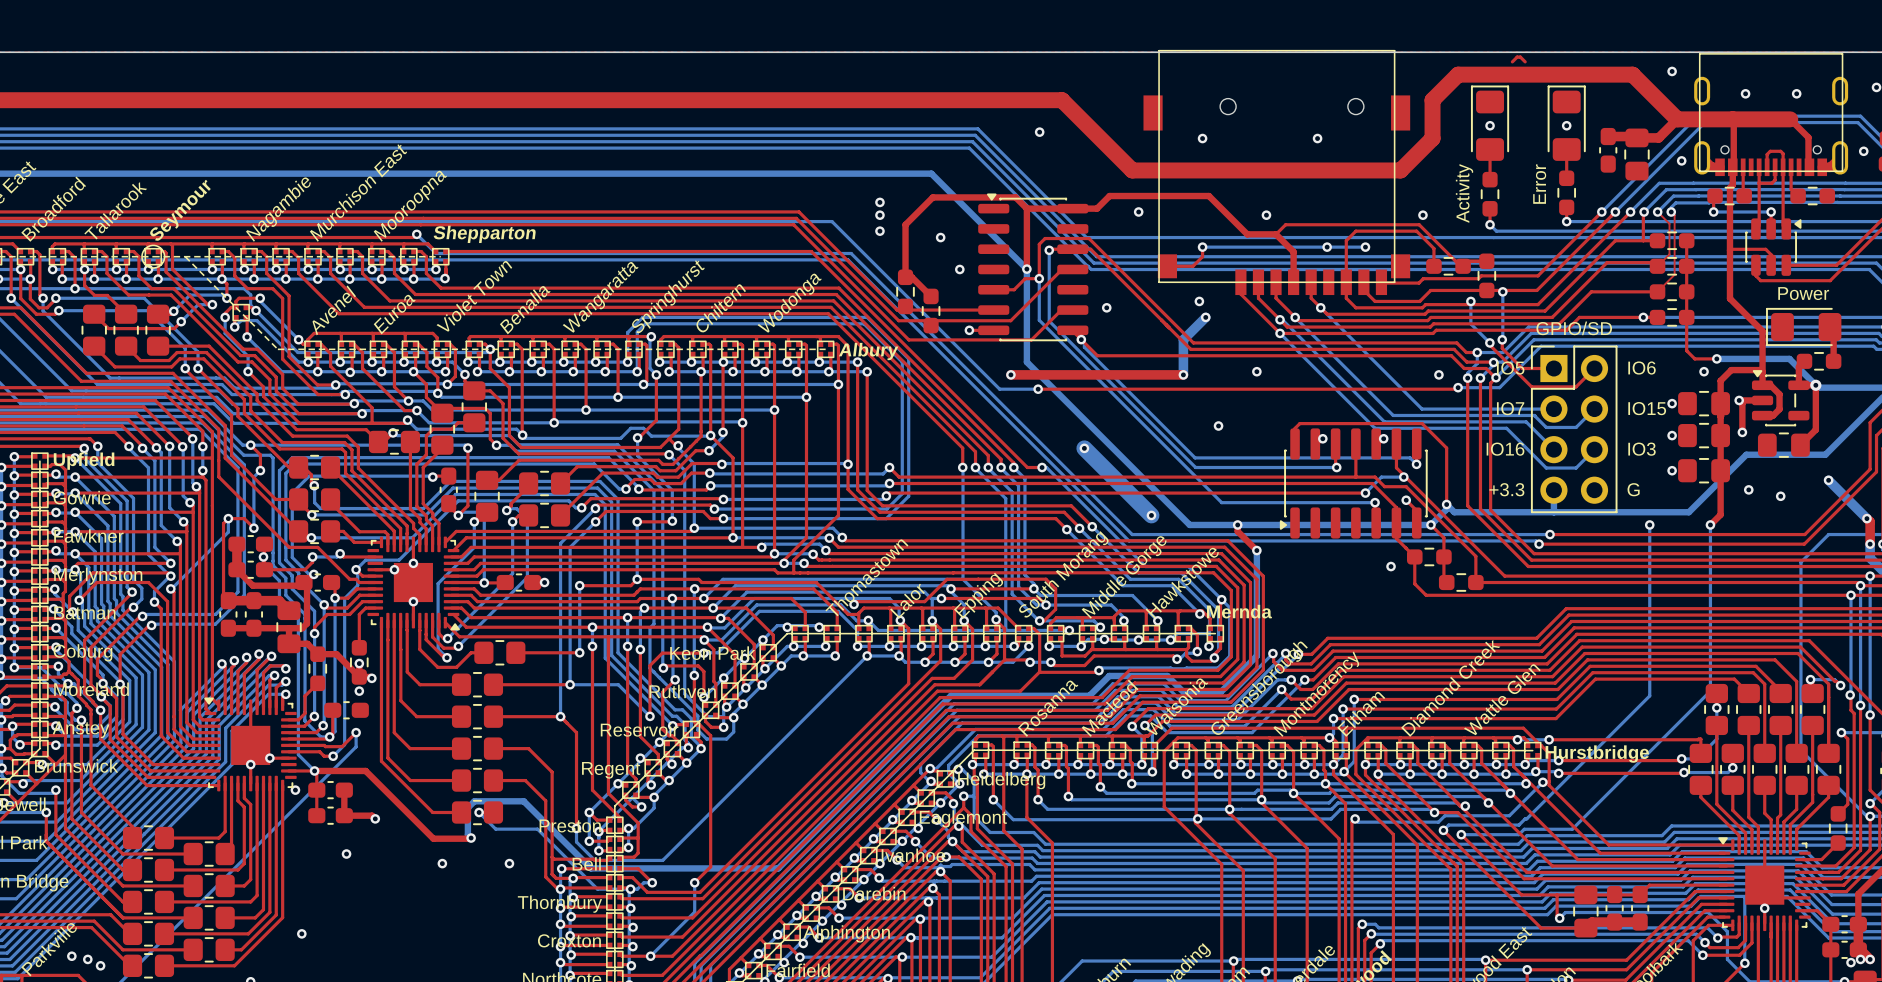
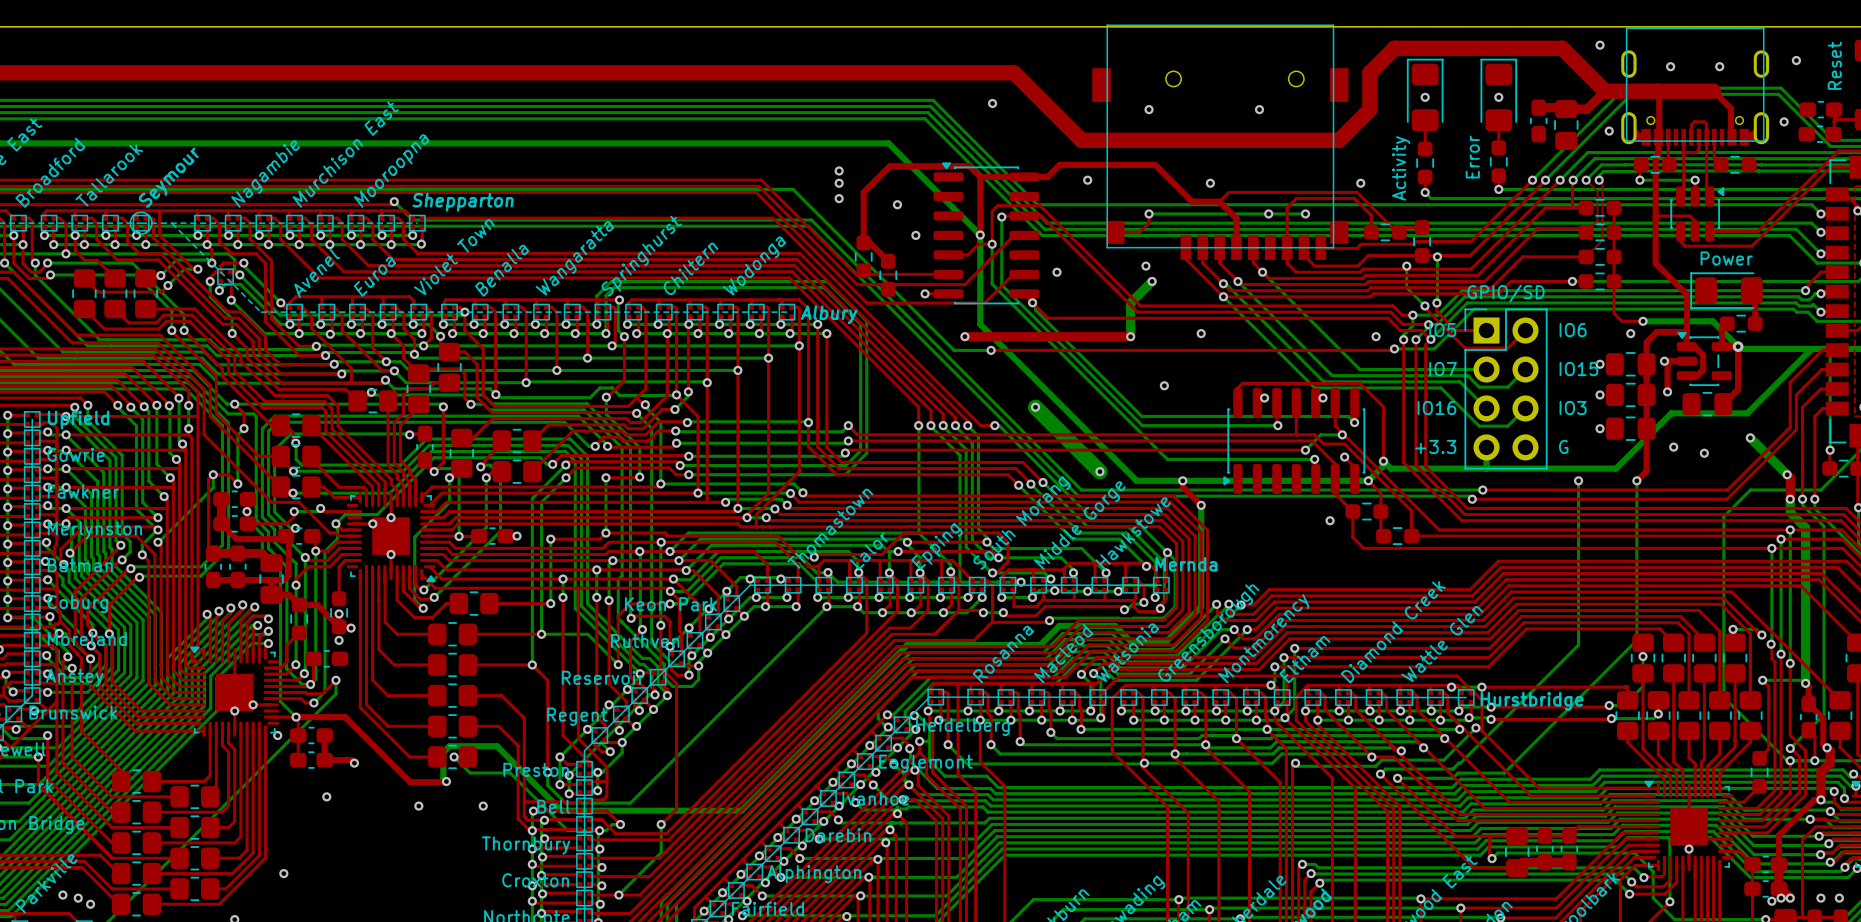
top track: (1512, 61) (1517, 57) (1520, 57) (1525, 61) -> none

